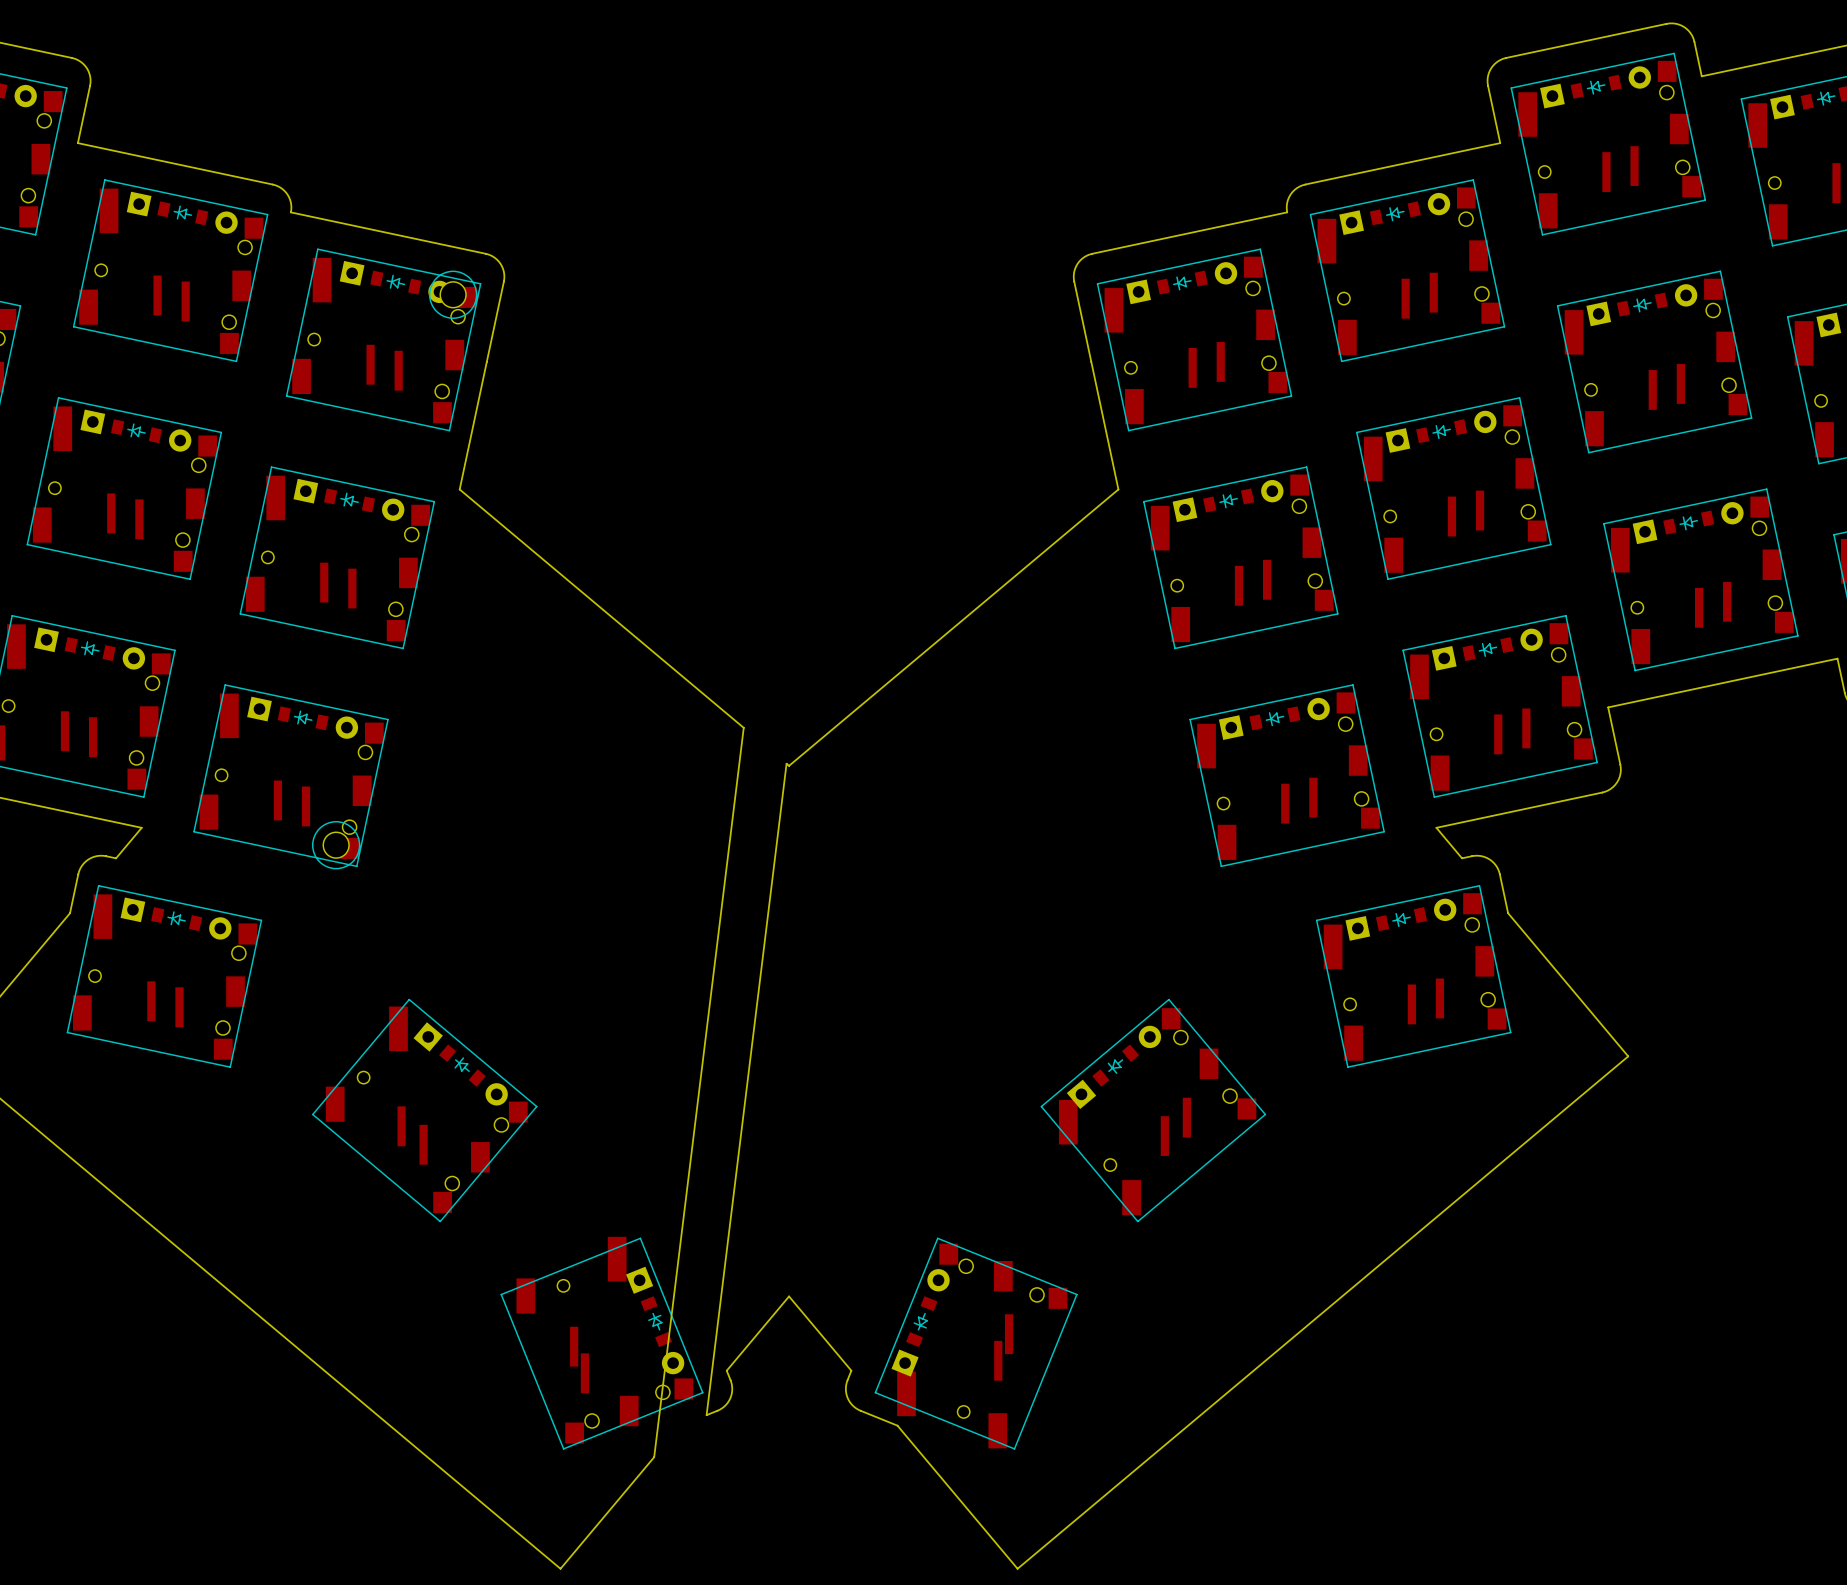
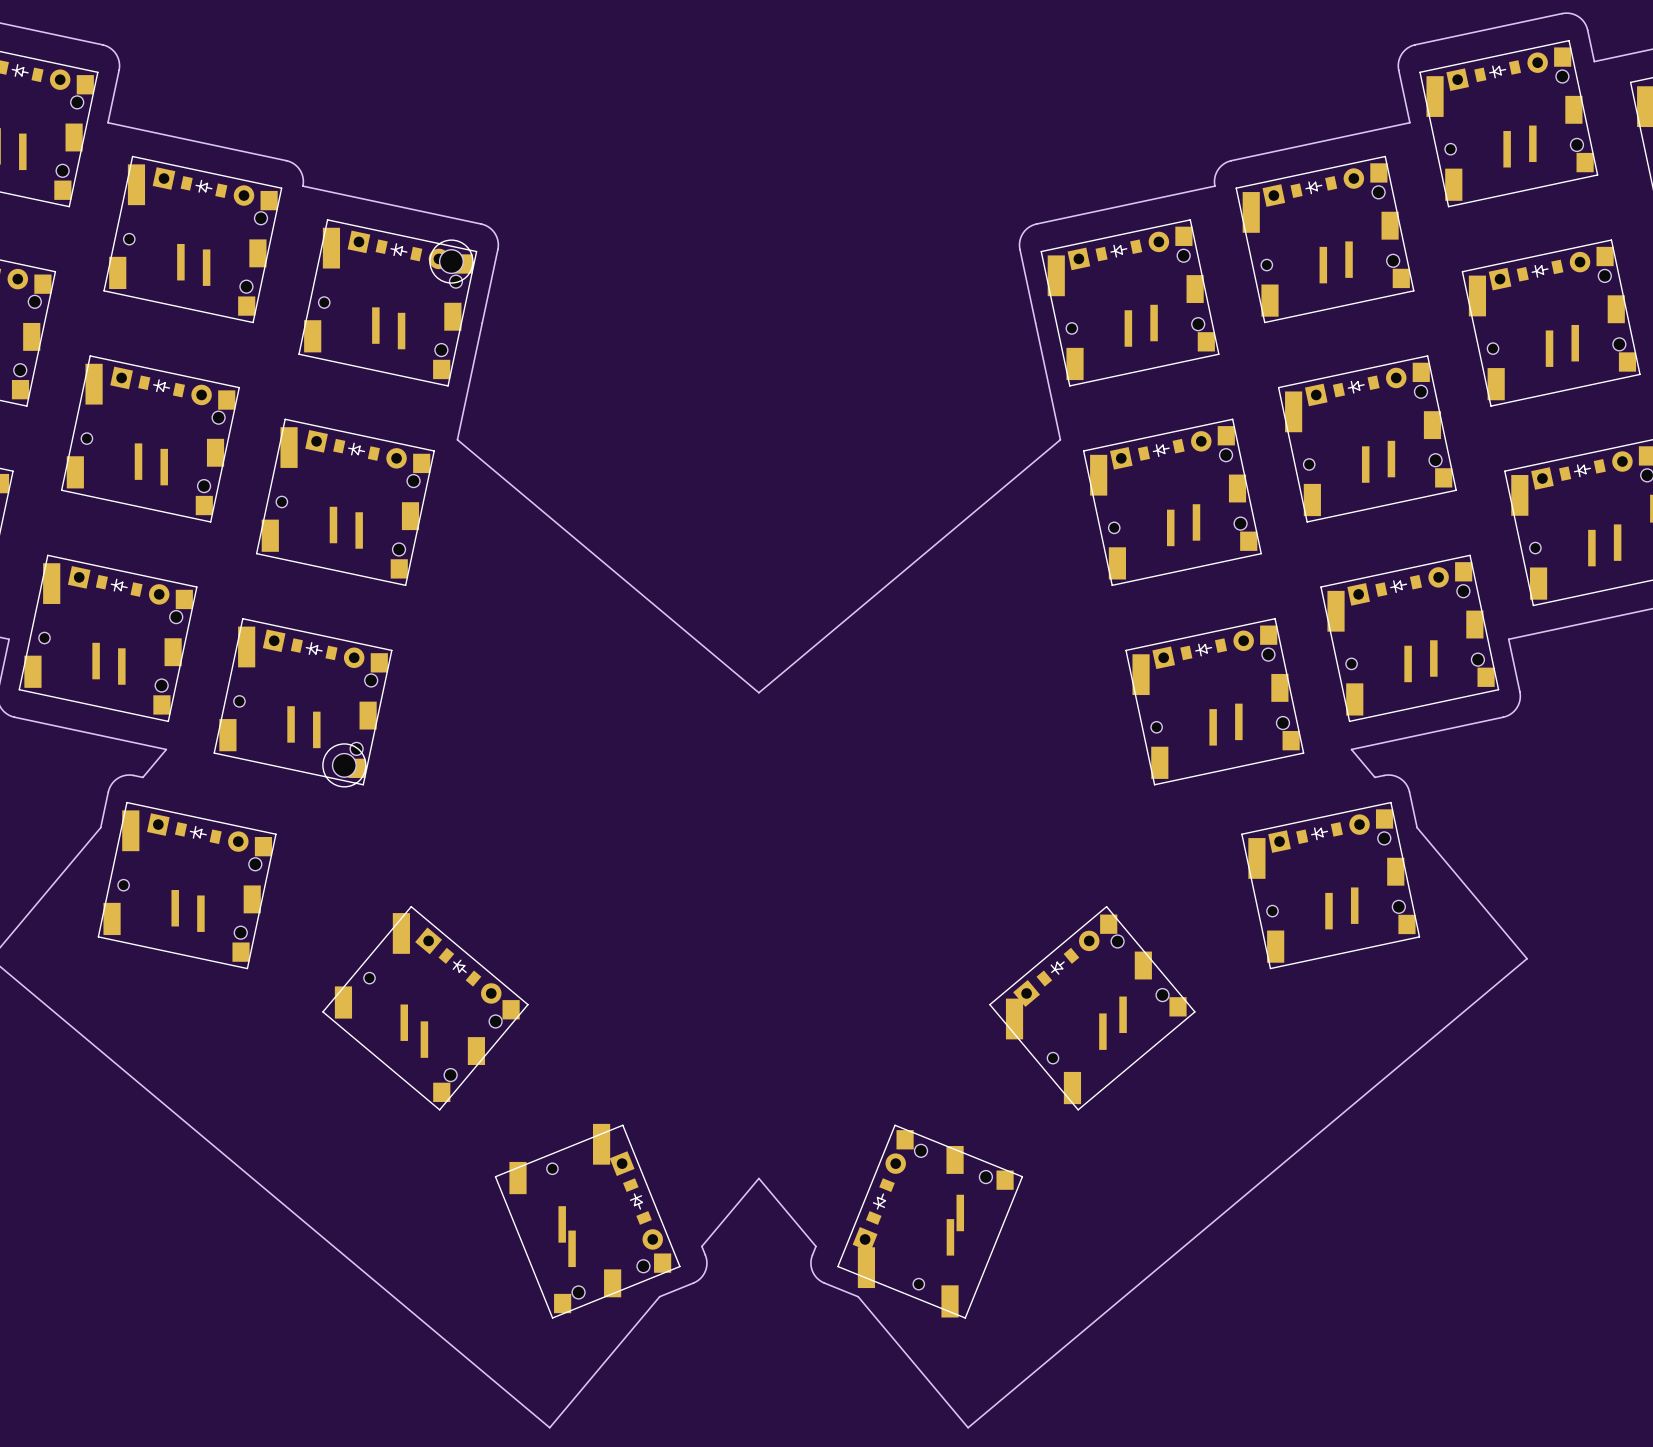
board edge: (743, 727) (654, 1457) -> (683, 1287) (659, 1296) (635, 1325)
board edge: (786, 763) (706, 1415) -> (756, 690) (717, 657)

